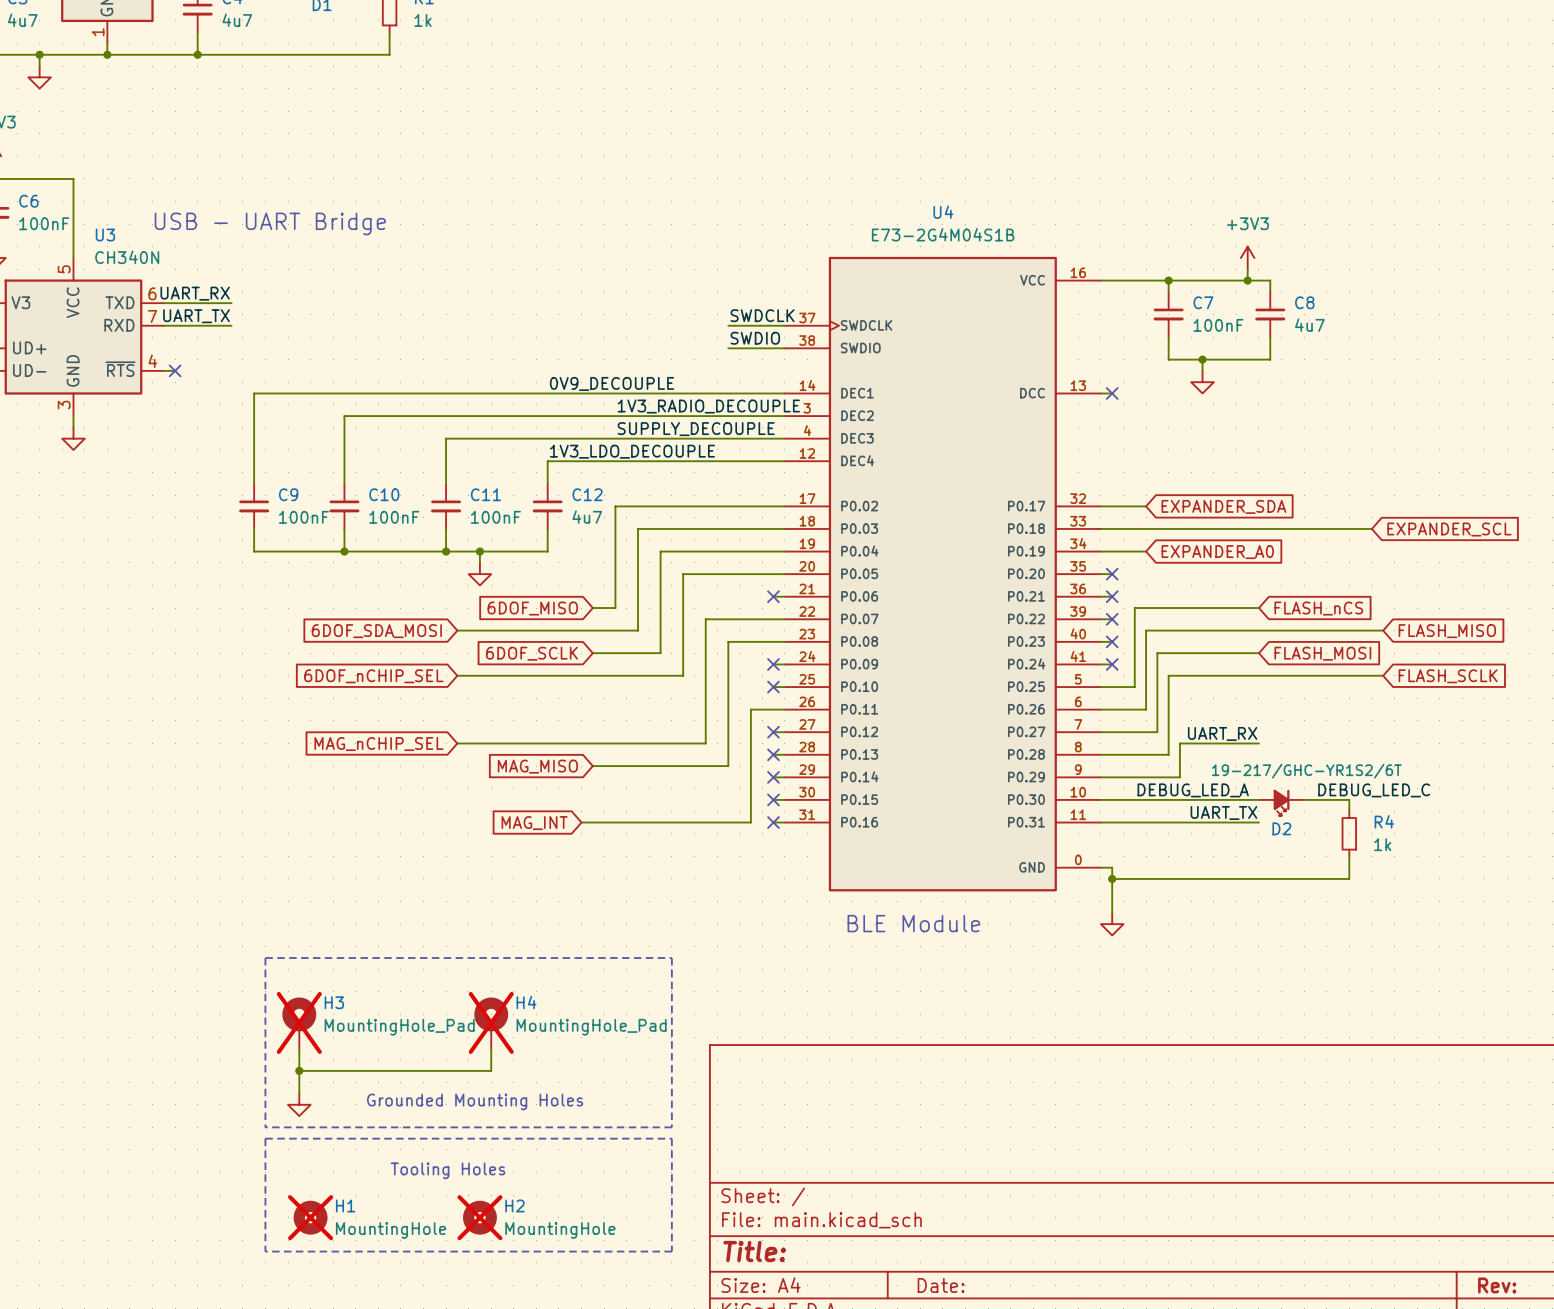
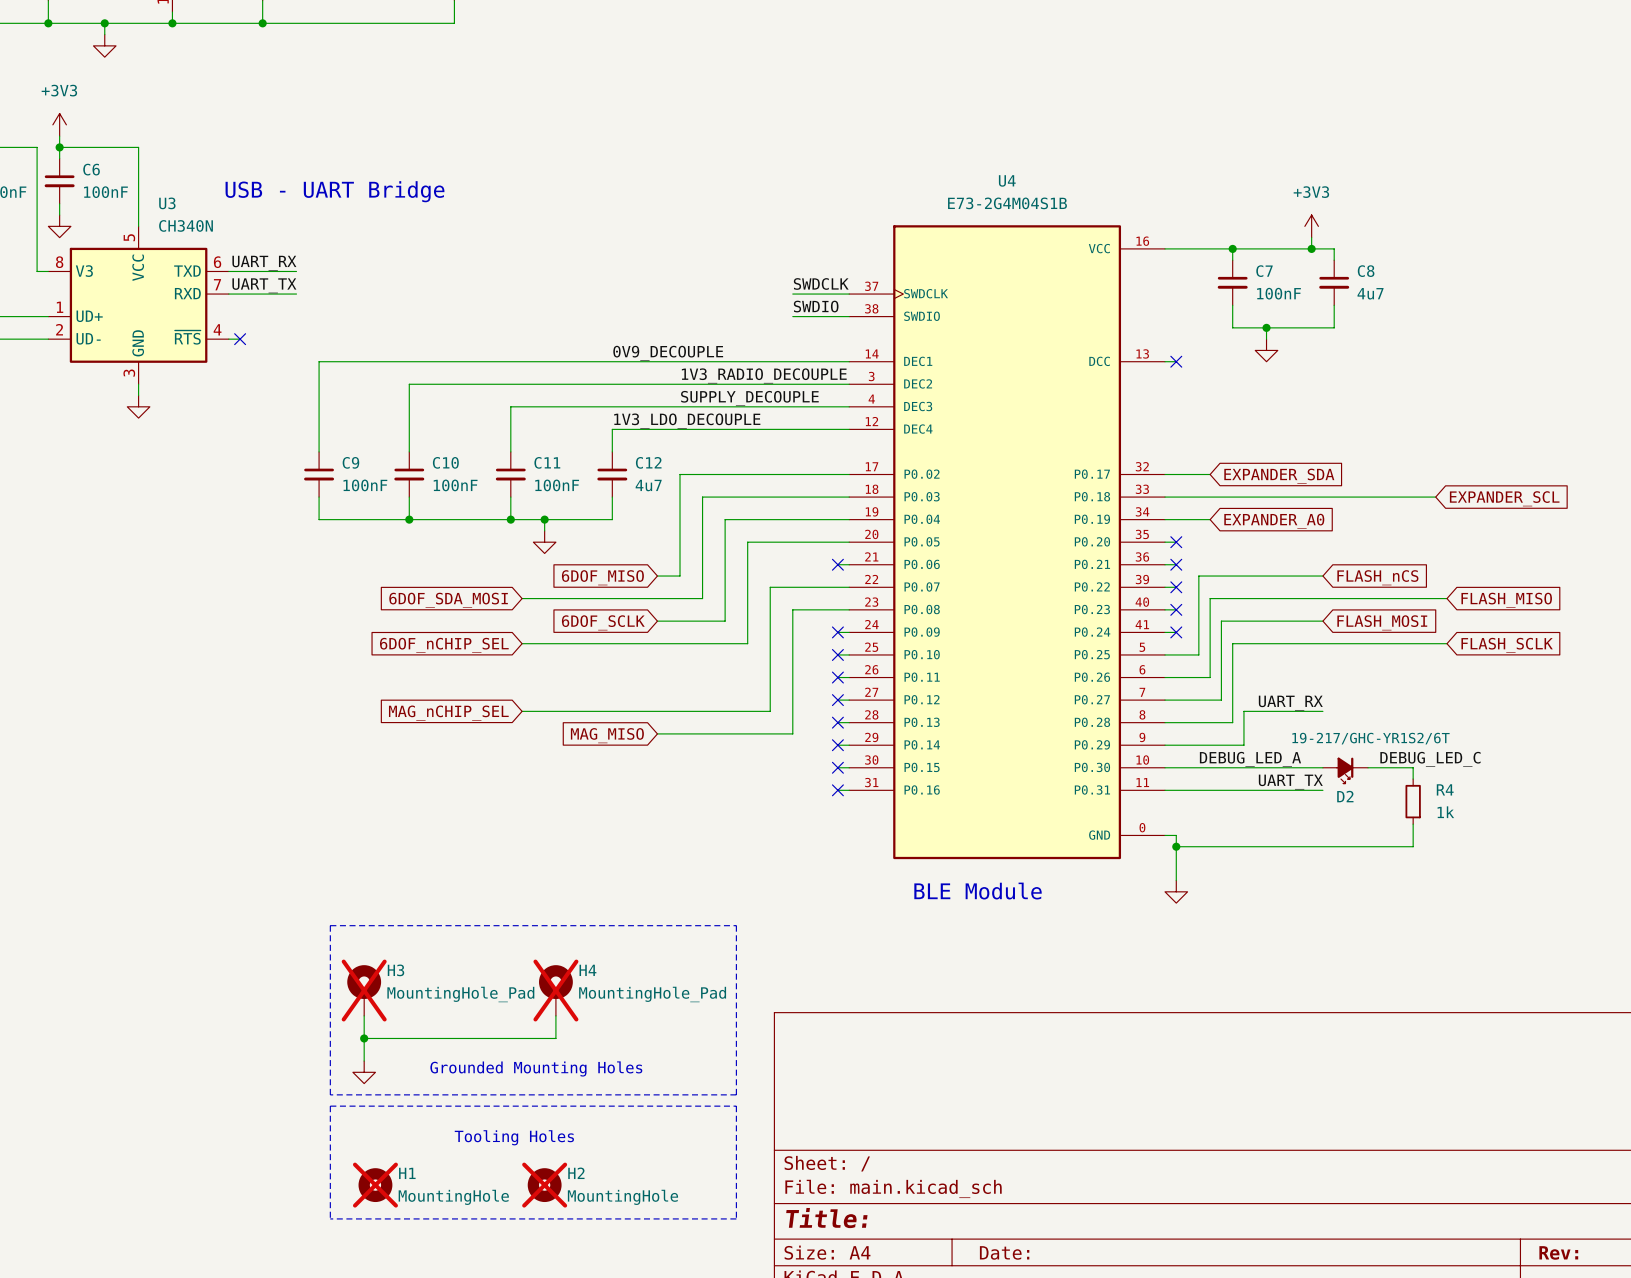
wire: (773, 709) (750, 709) (750, 822) (581, 822) -> none
no-connect mark: none -> (837, 677)
global label: MAG_INT (534, 823) -> none

